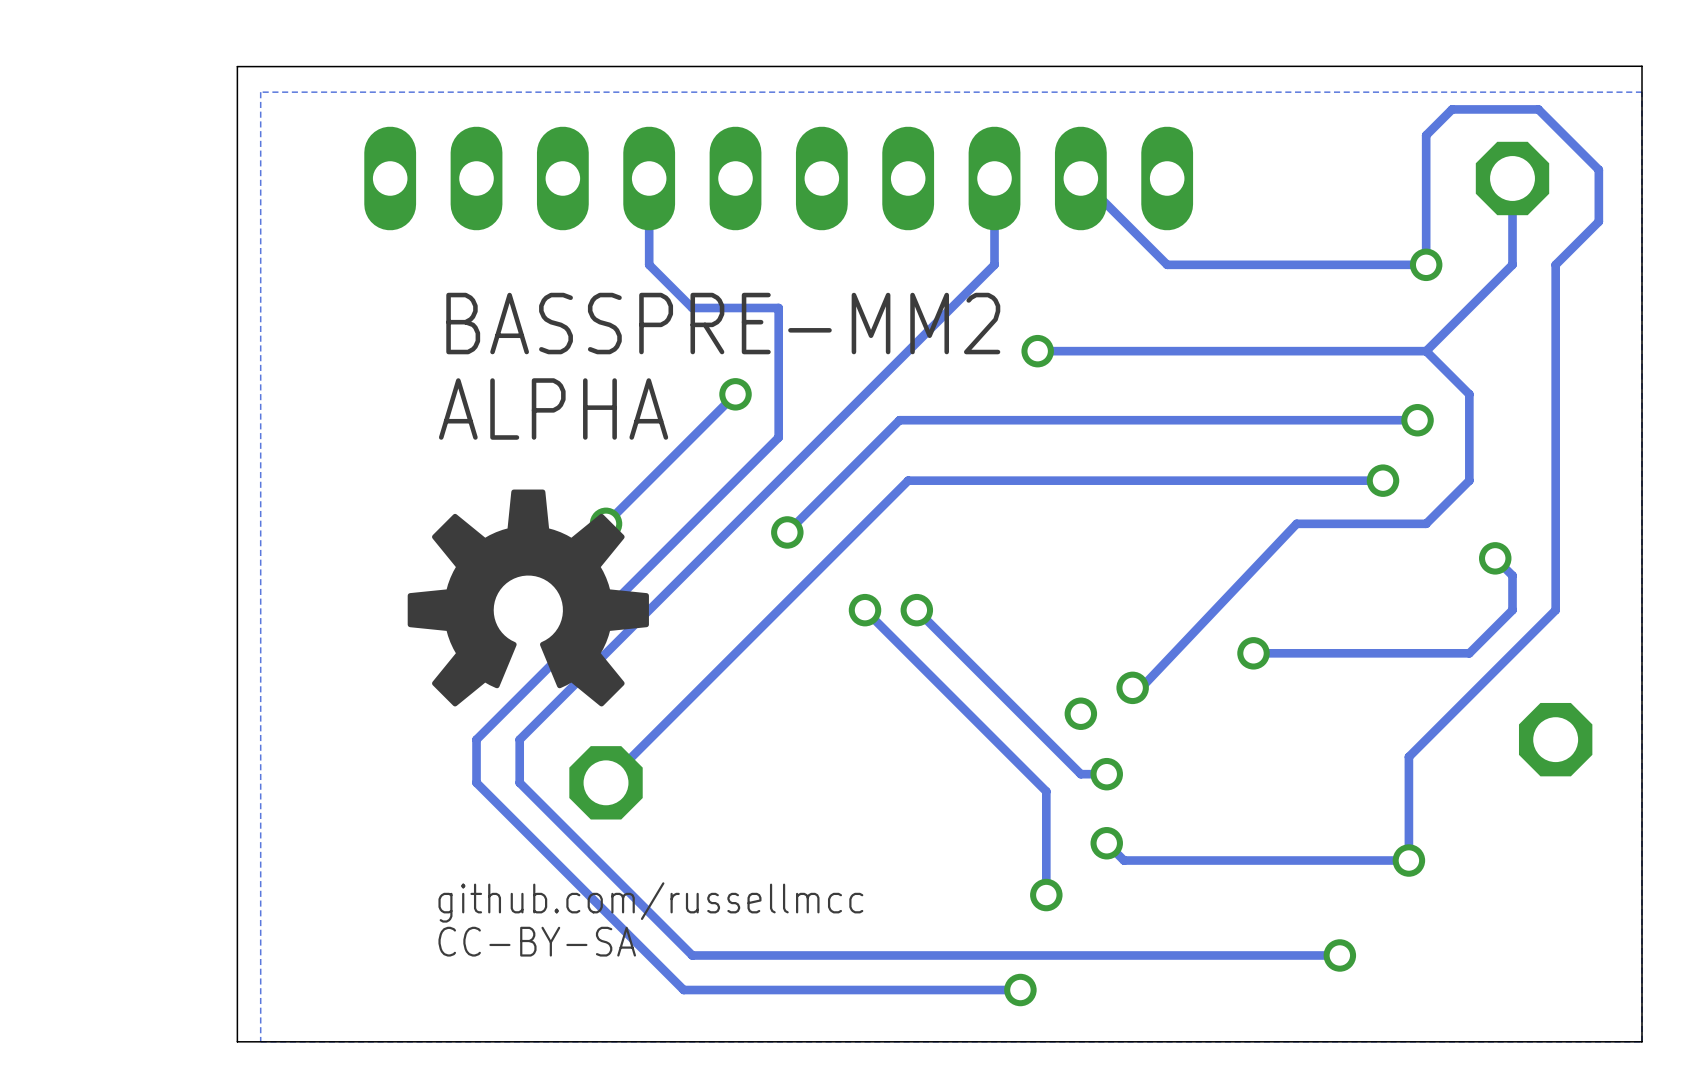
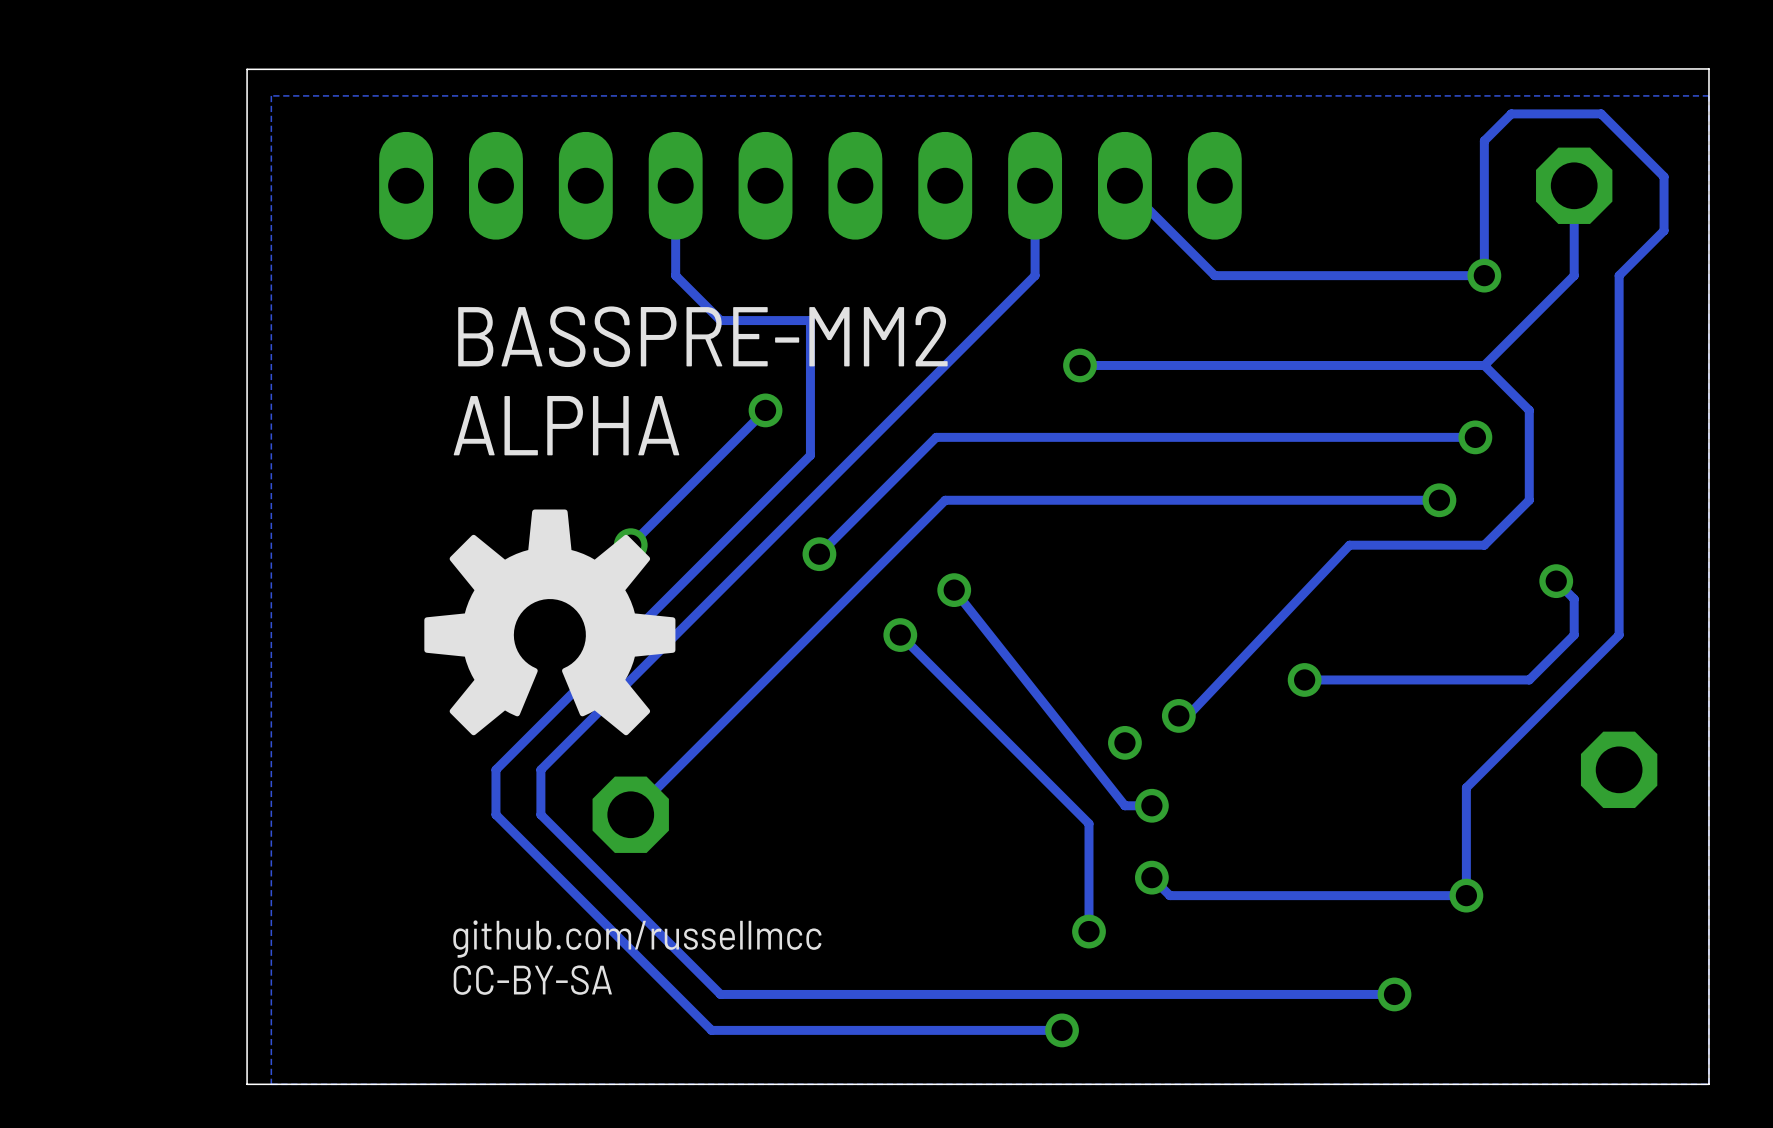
track: (916, 610) (1080, 774) -> (954, 590) (1124, 805)
via position: (916, 610) -> (954, 590)

